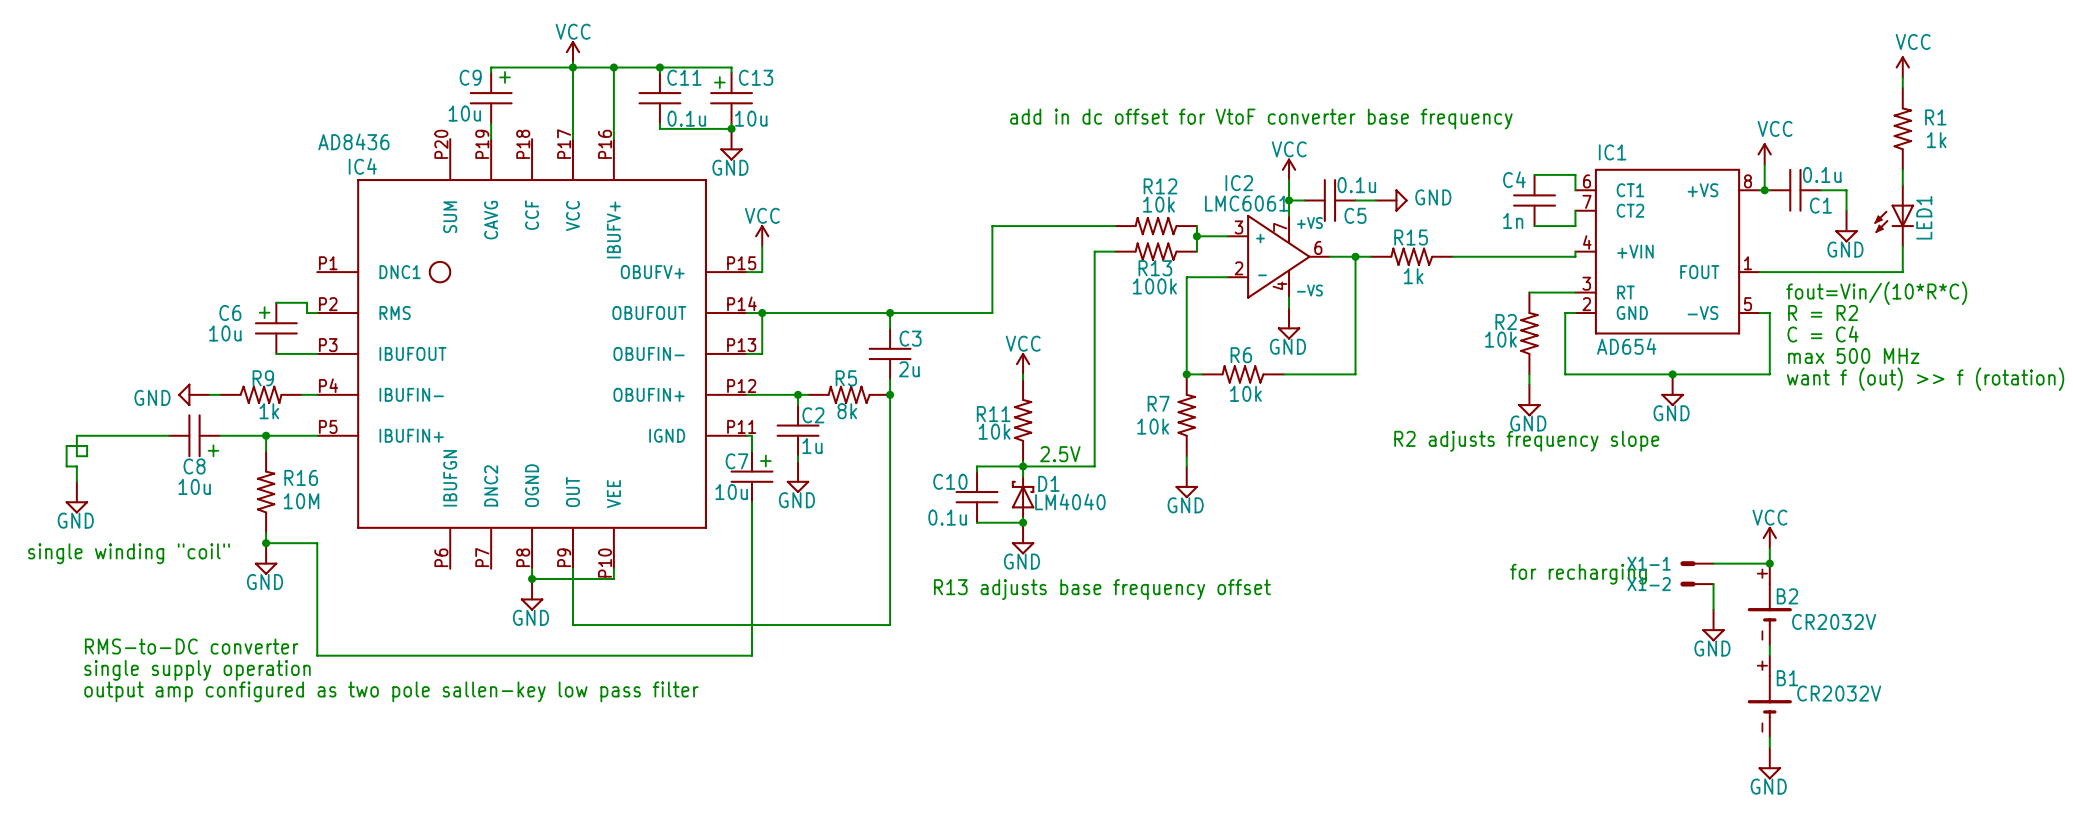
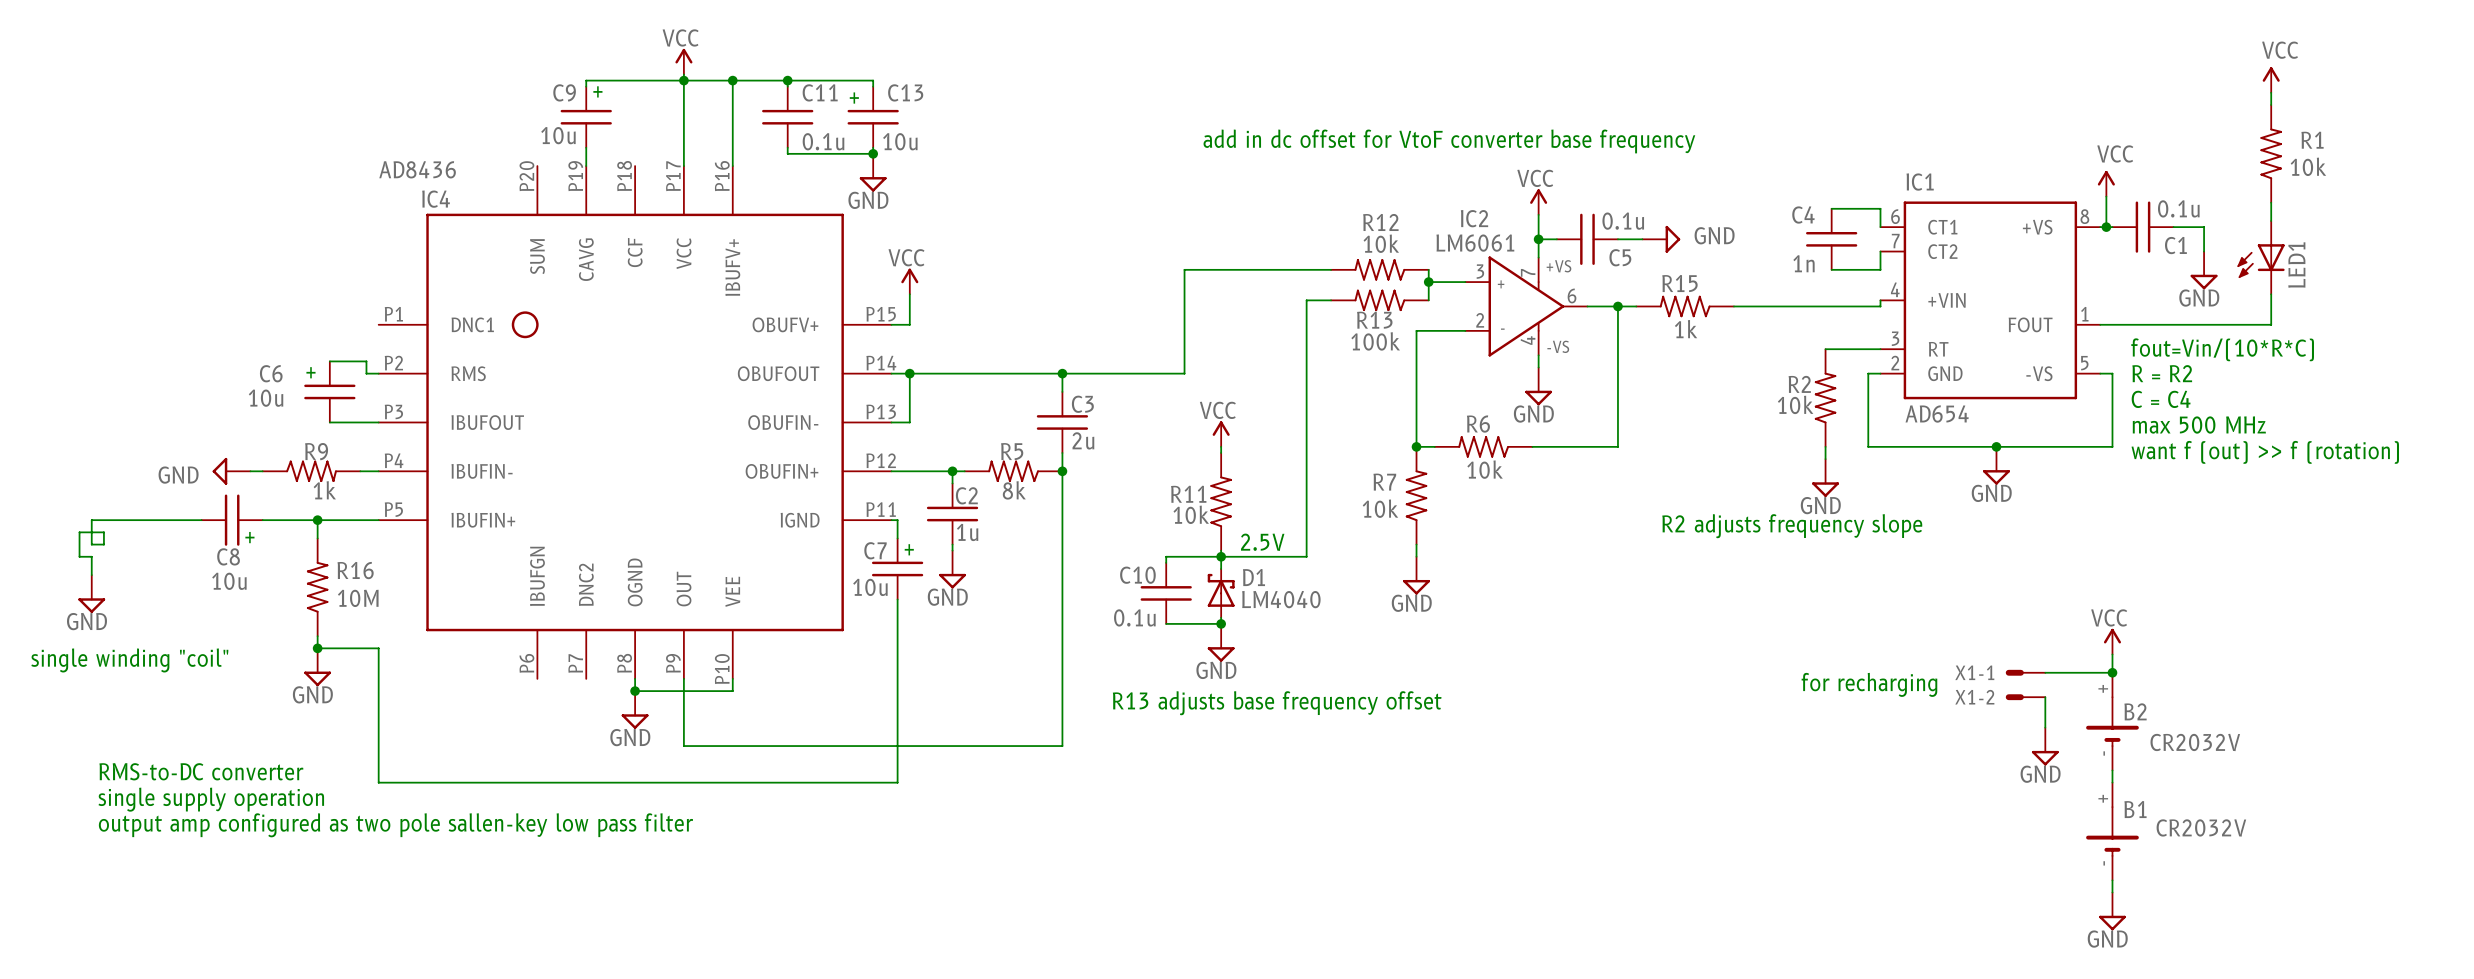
R1 value: 1k (1936, 140) -> 10k (2308, 166)
IC2 value: LMC6061 (1246, 203) -> LM6061 (1475, 243)

